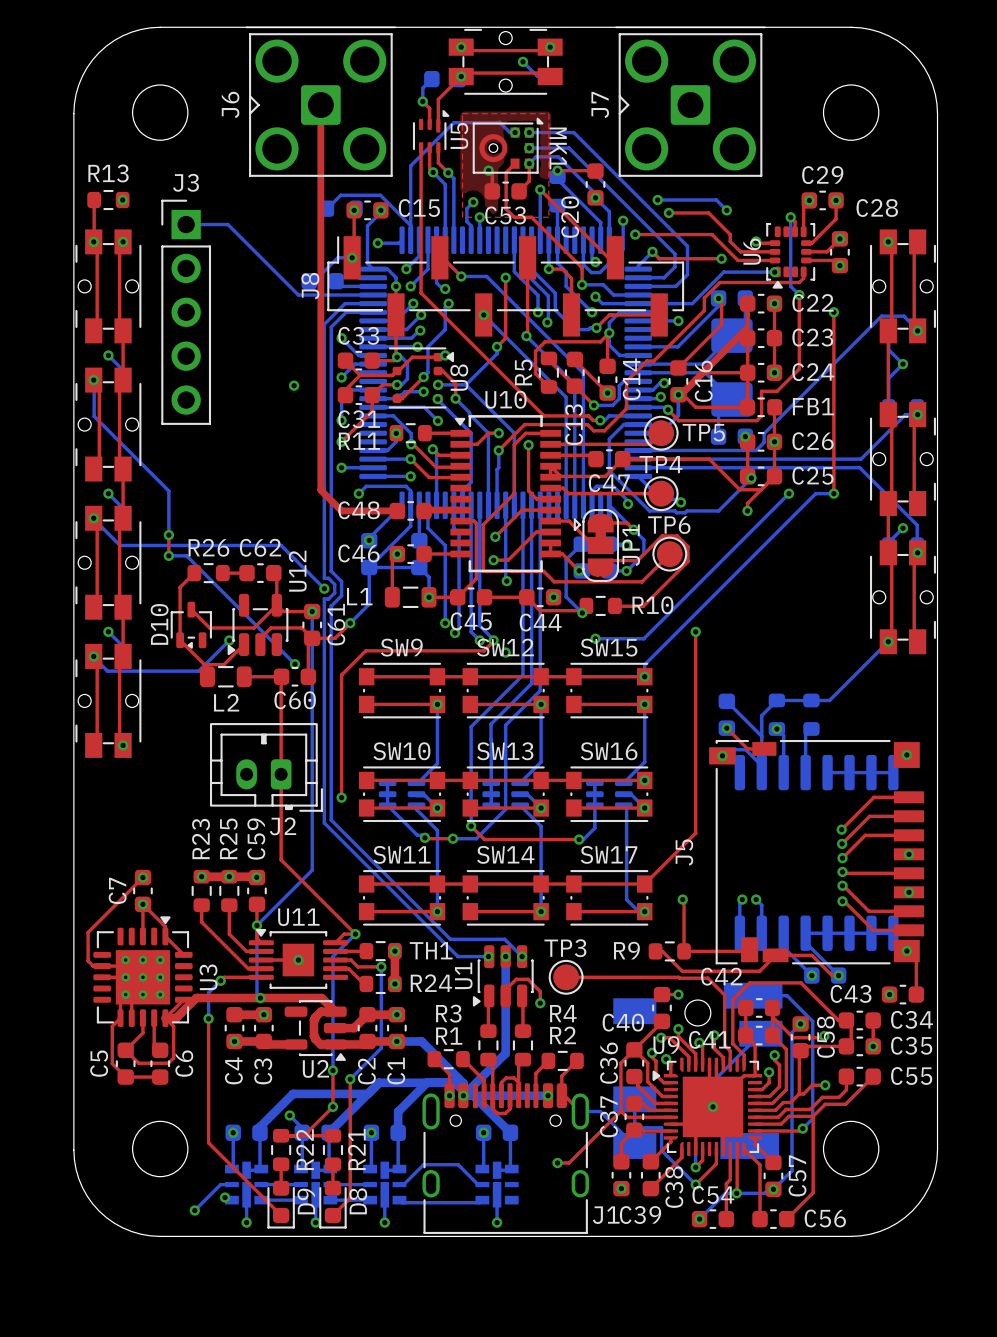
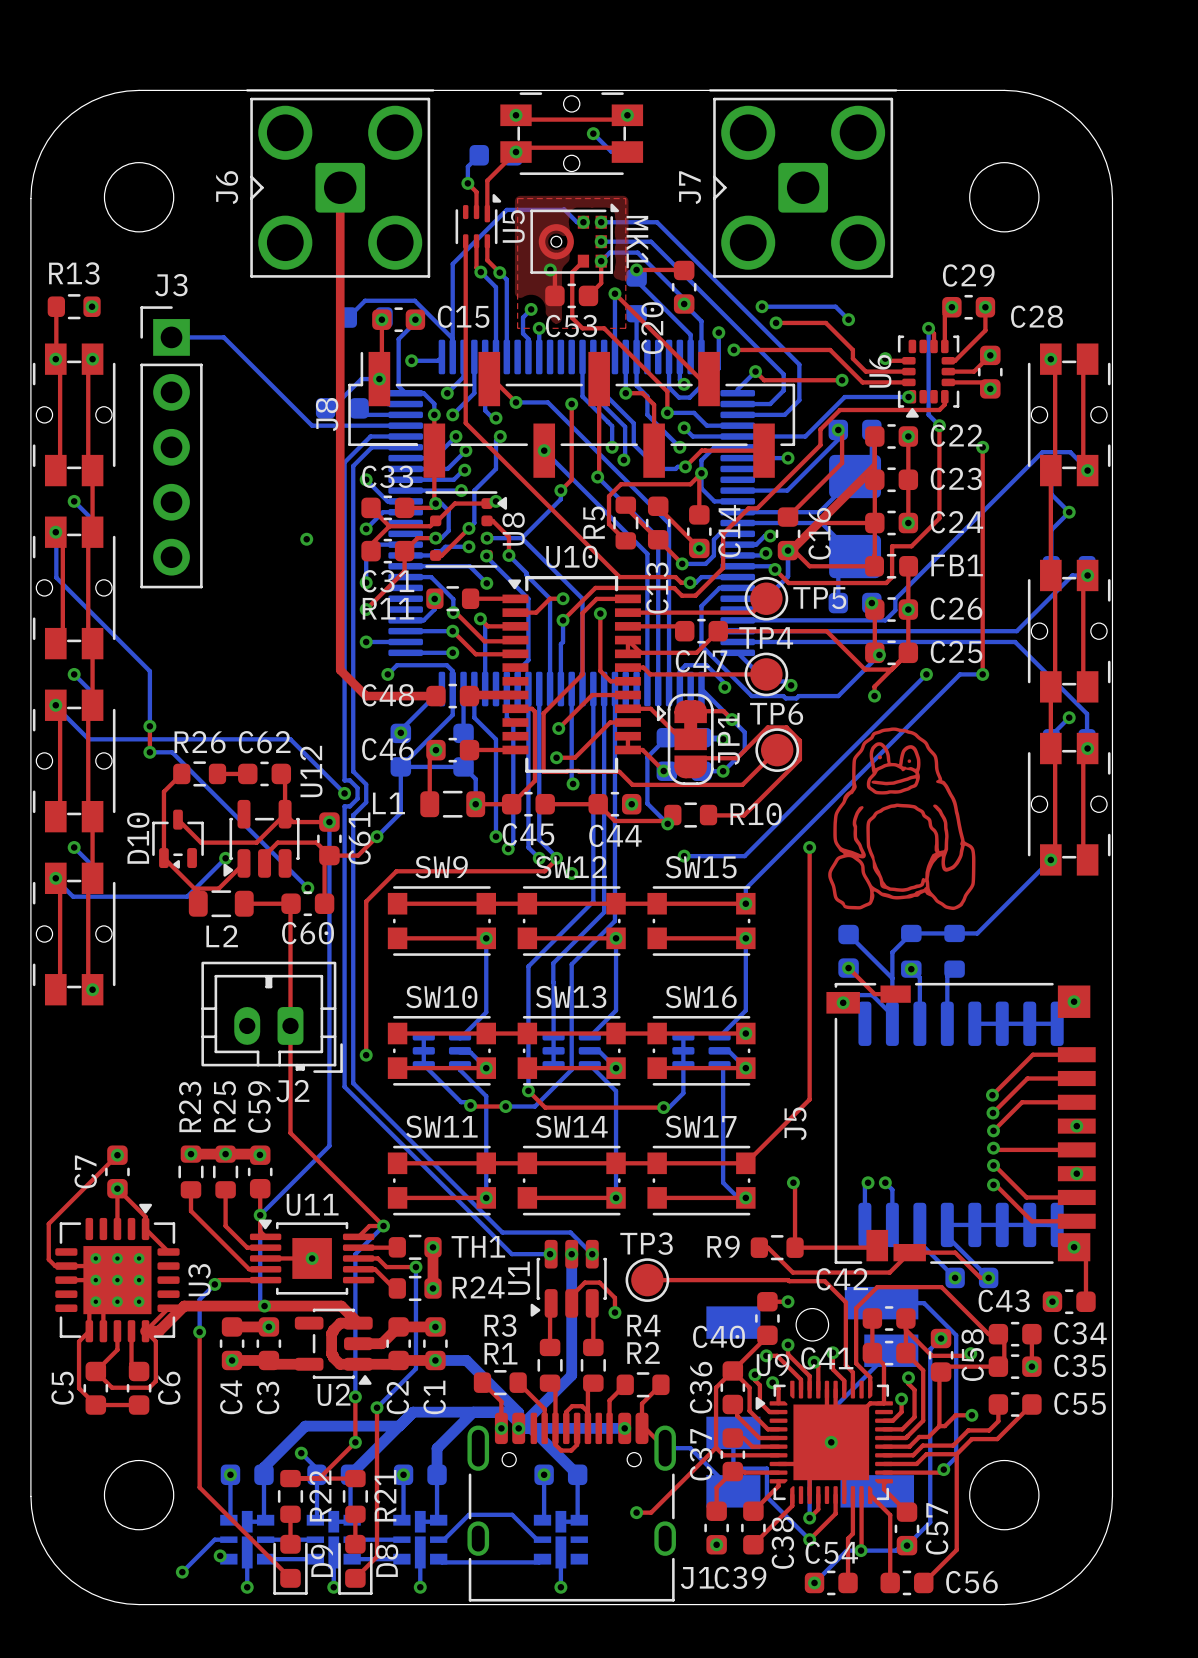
drawing: none -> [828, 727, 976, 911]

